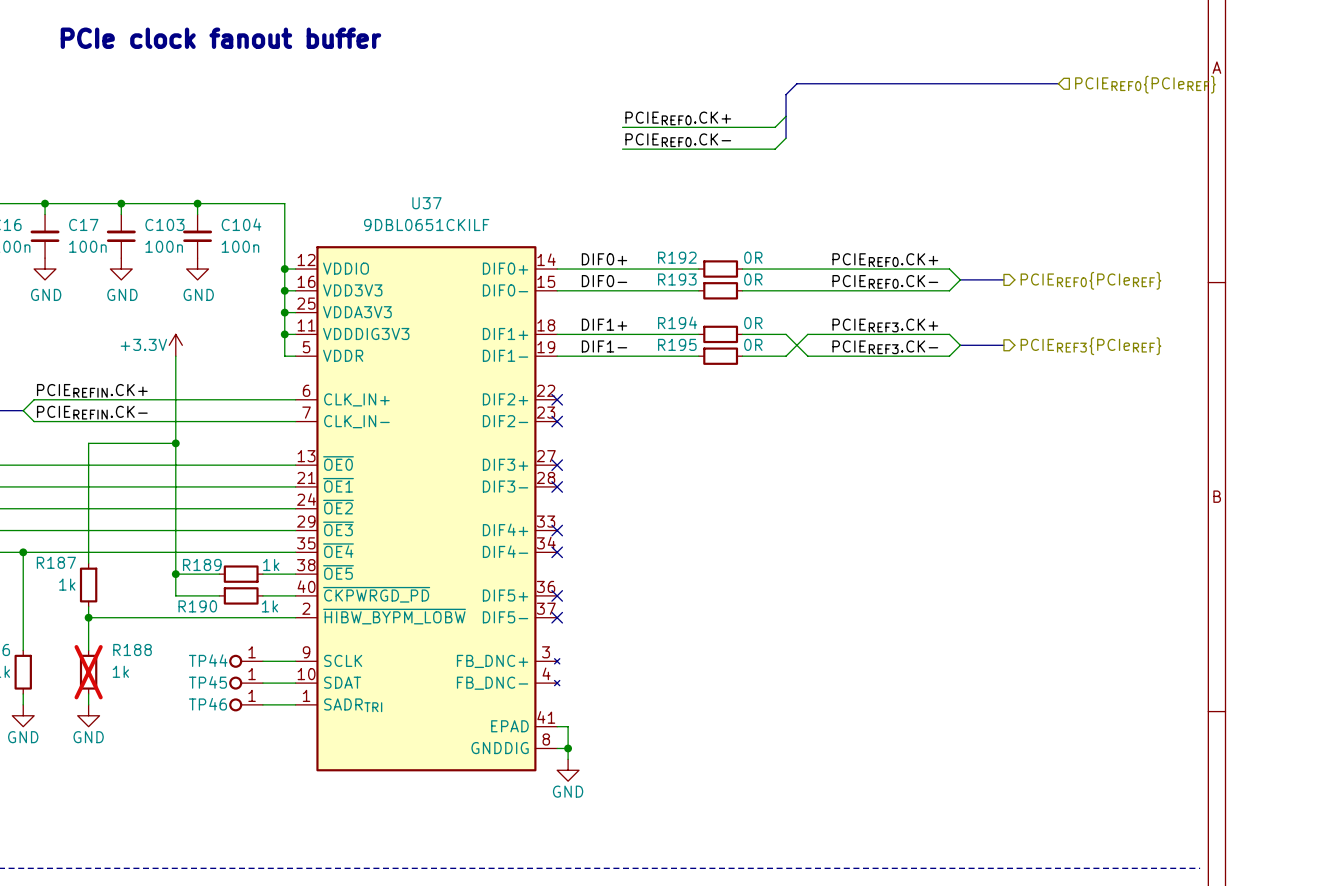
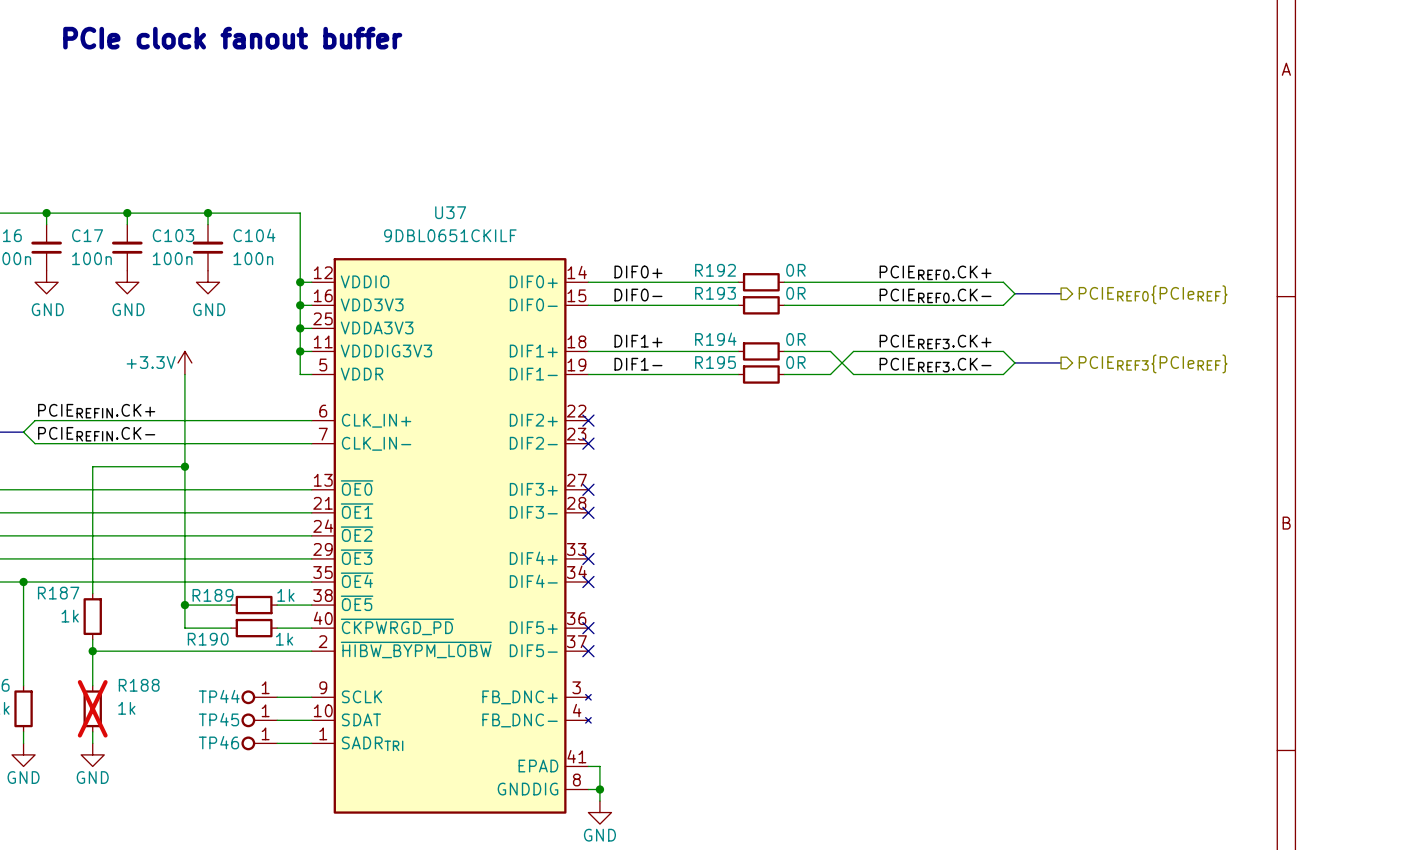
bus: (1058, 83) (796, 83) (786, 94) (786, 138) -> none
hierarchical label: PCIEREF0{PCIeREF} (1145, 84) -> none
wire: (786, 116) (775, 127) (622, 127) -> none
label: PCIEREF0.CK+ (678, 118) -> none
wire: (786, 138) (775, 149) (622, 149) -> none
label: PCIEREF0.CK- (678, 140) -> none

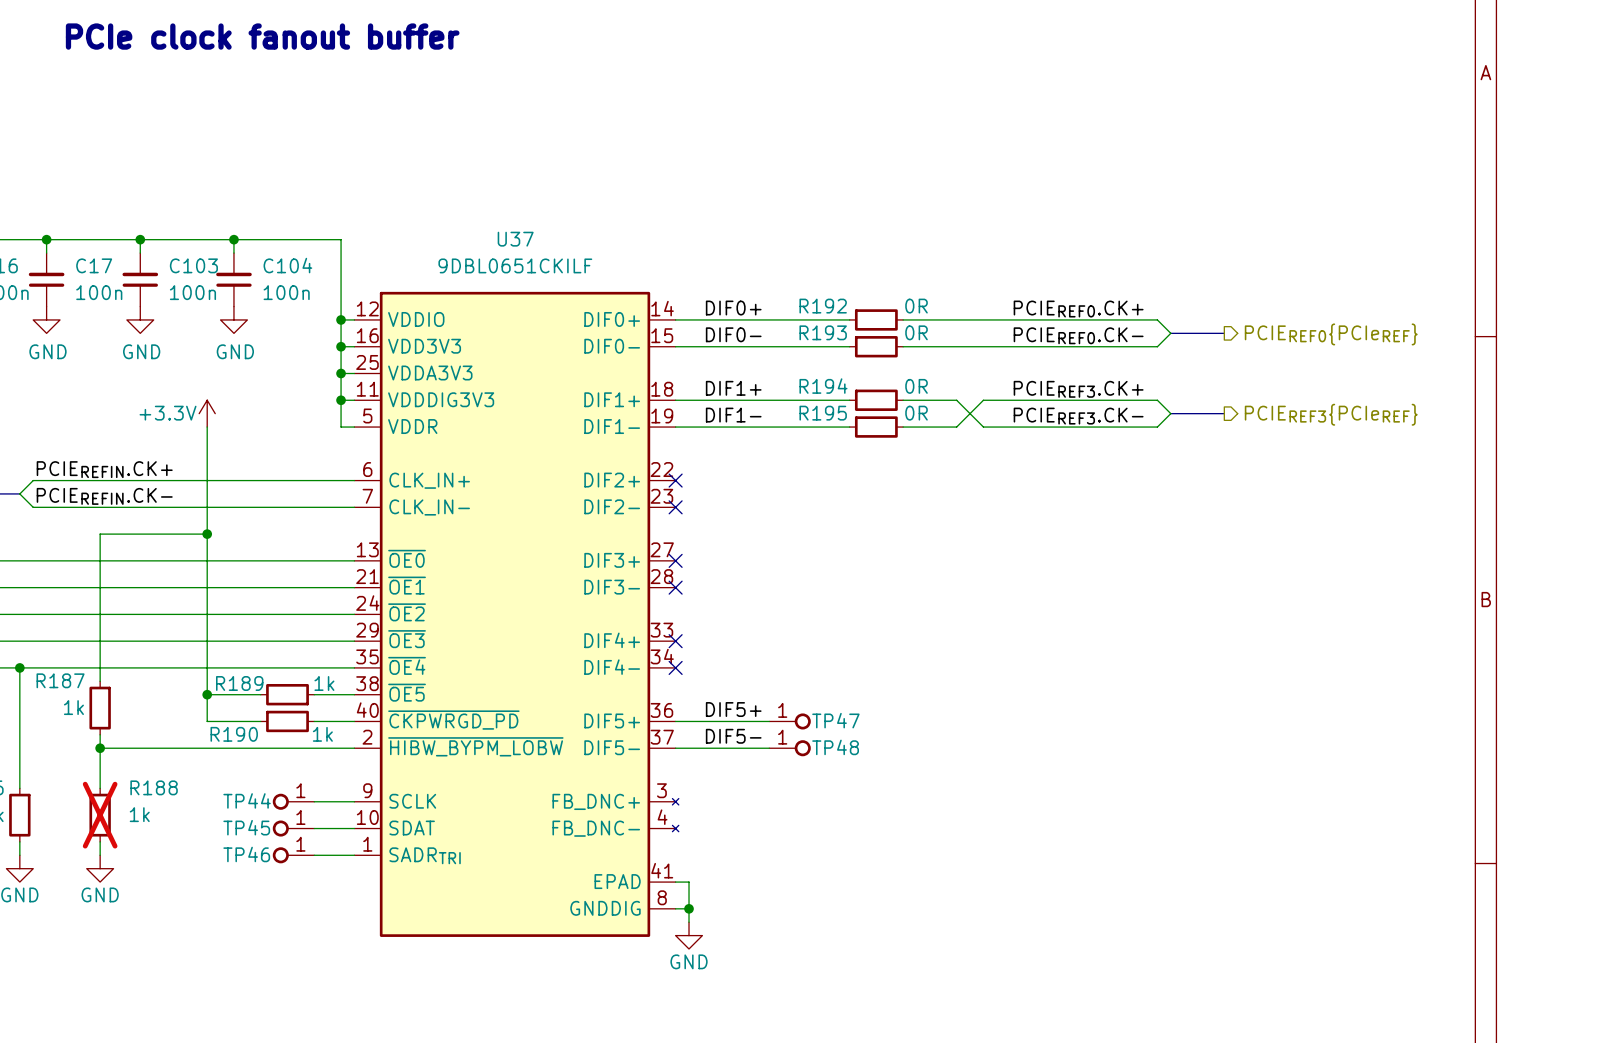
label: none -> DIF5+ (733, 709)
wire: none -> (675, 721) (769, 721)
no-connect mark: (588, 628) -> none
TP47: none -> (790, 721)
label: none -> DIF5- (733, 736)
wire: none -> (675, 748) (769, 748)
no-connect mark: (588, 651) -> none
TP48: none -> (790, 748)

